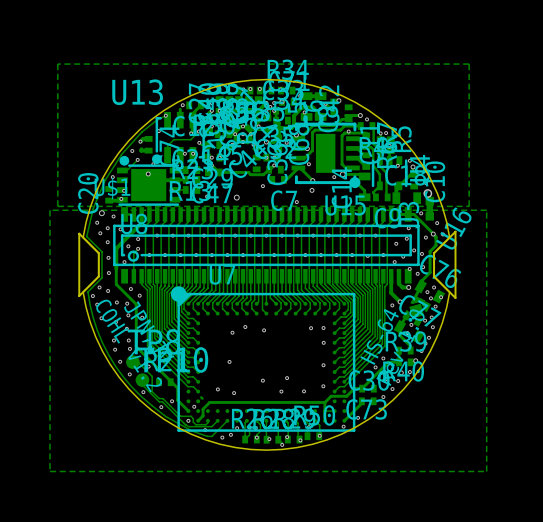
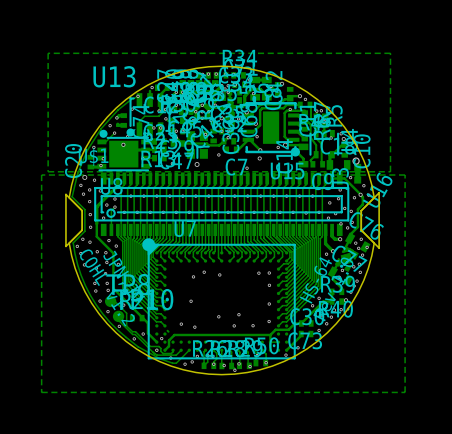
via: none -> (205, 134)
part: none -> (198, 145)

